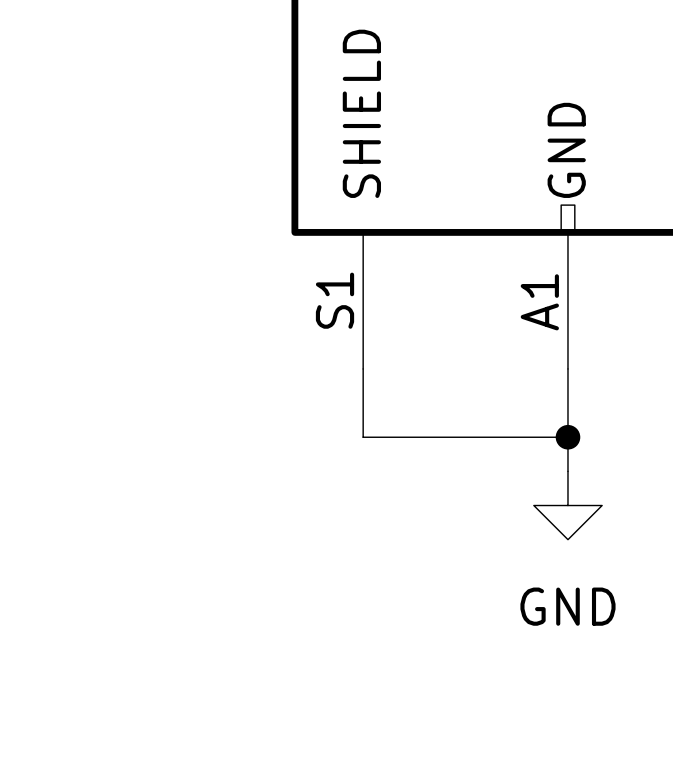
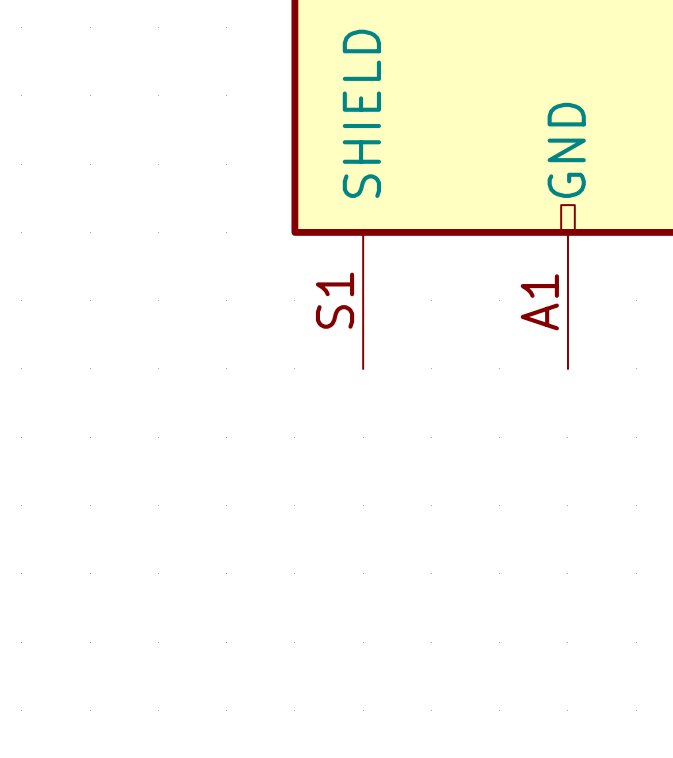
wire: (363, 368) (363, 437) (567, 437) -> none
wire: (567, 368) (567, 471) -> none
junction: (567, 437) -> none
power symbol: GND (567, 505) -> none

